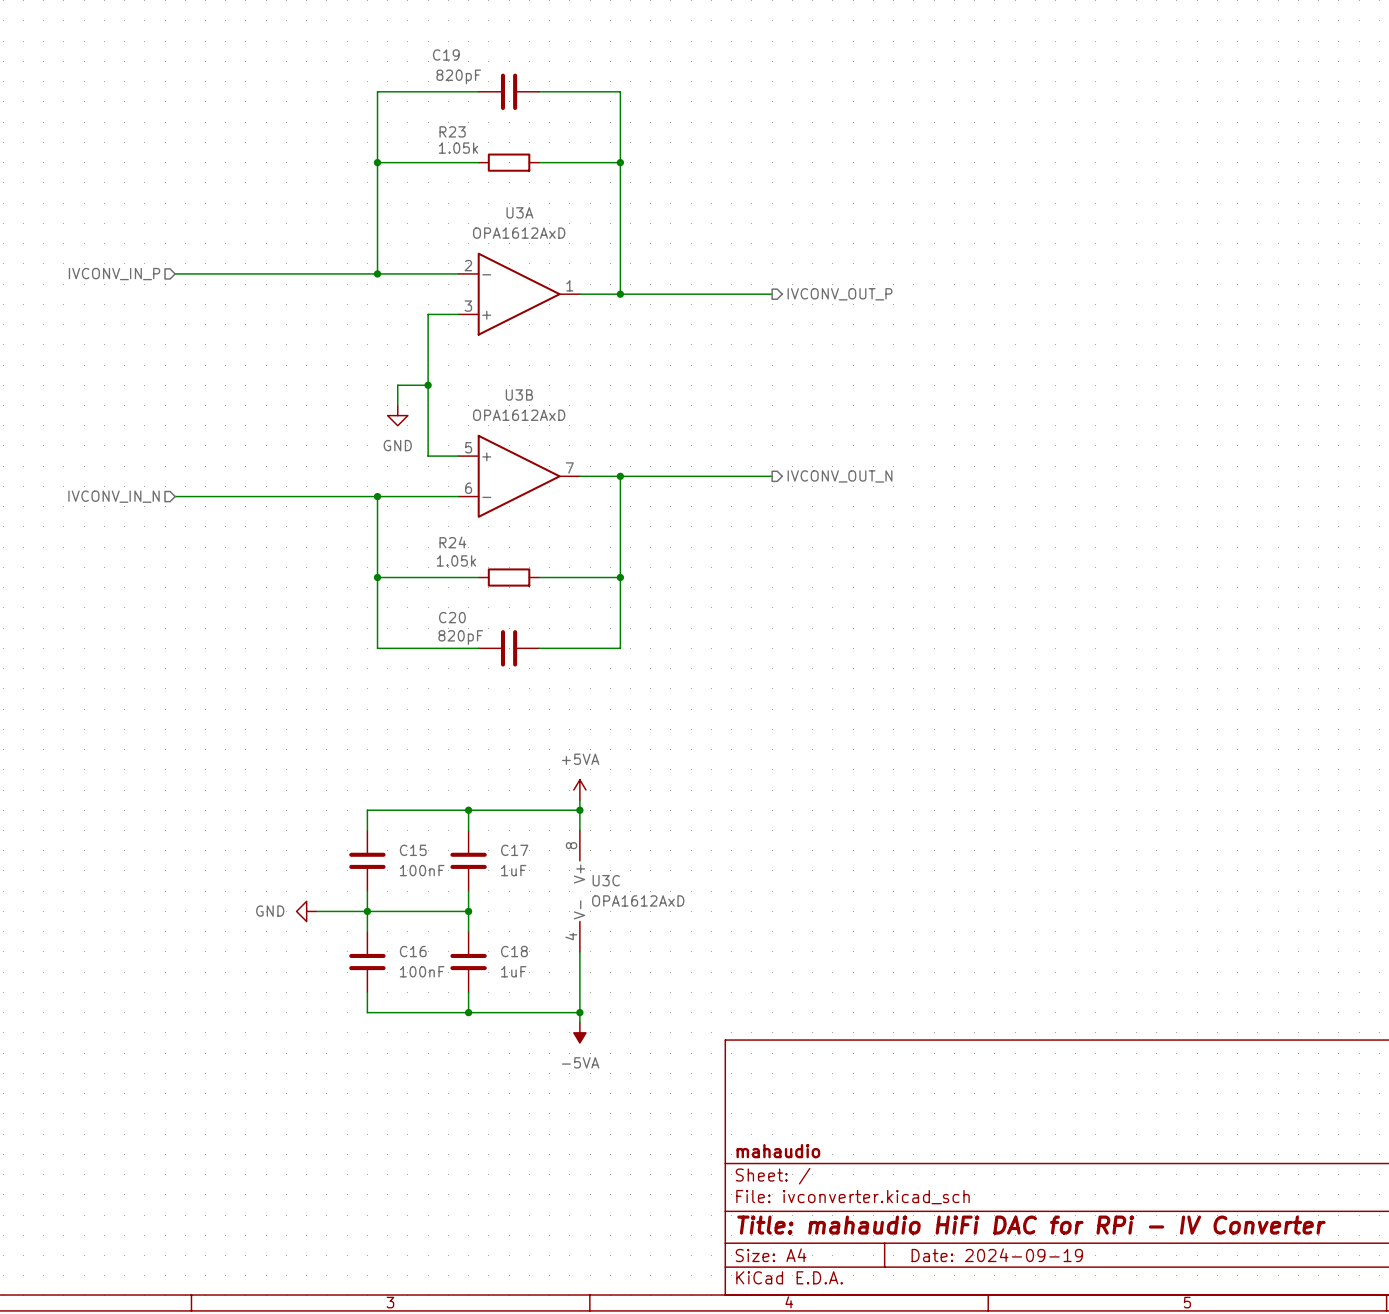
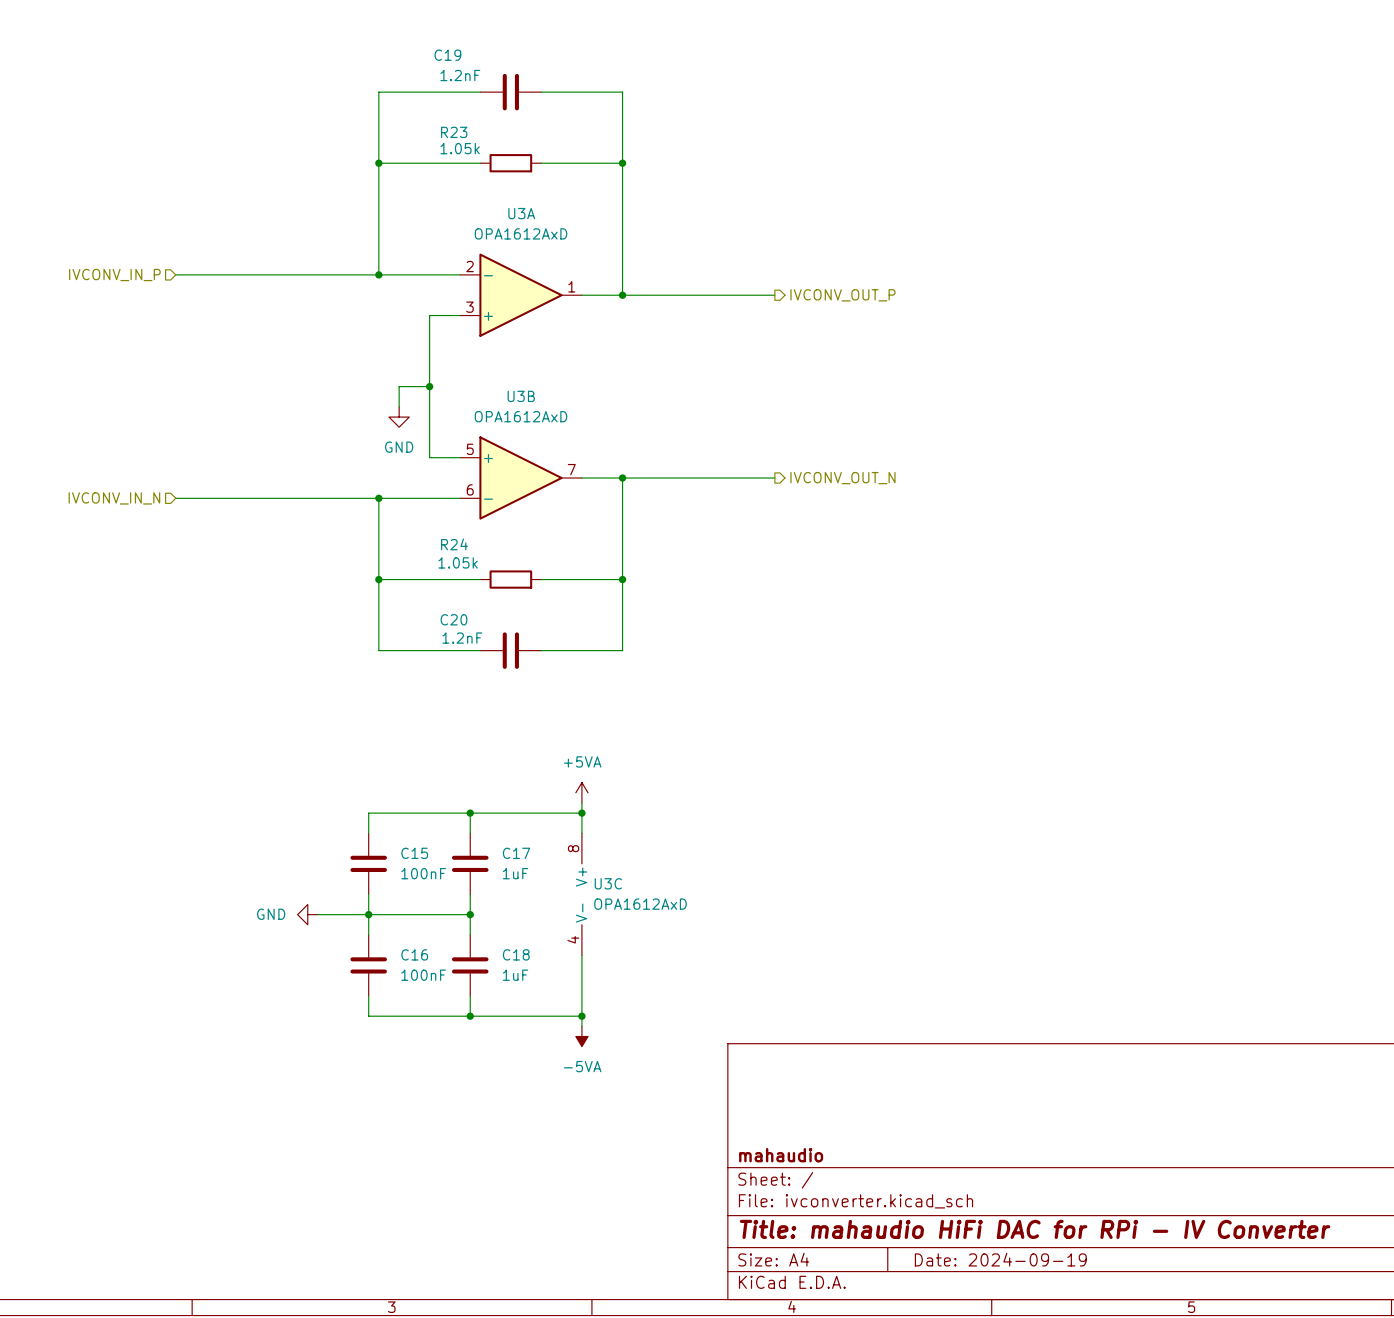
C19 value: 820pF (458, 76) -> 1.2nF (460, 75)
C20 value: 820pF (460, 637) -> 1.2nF (462, 638)

